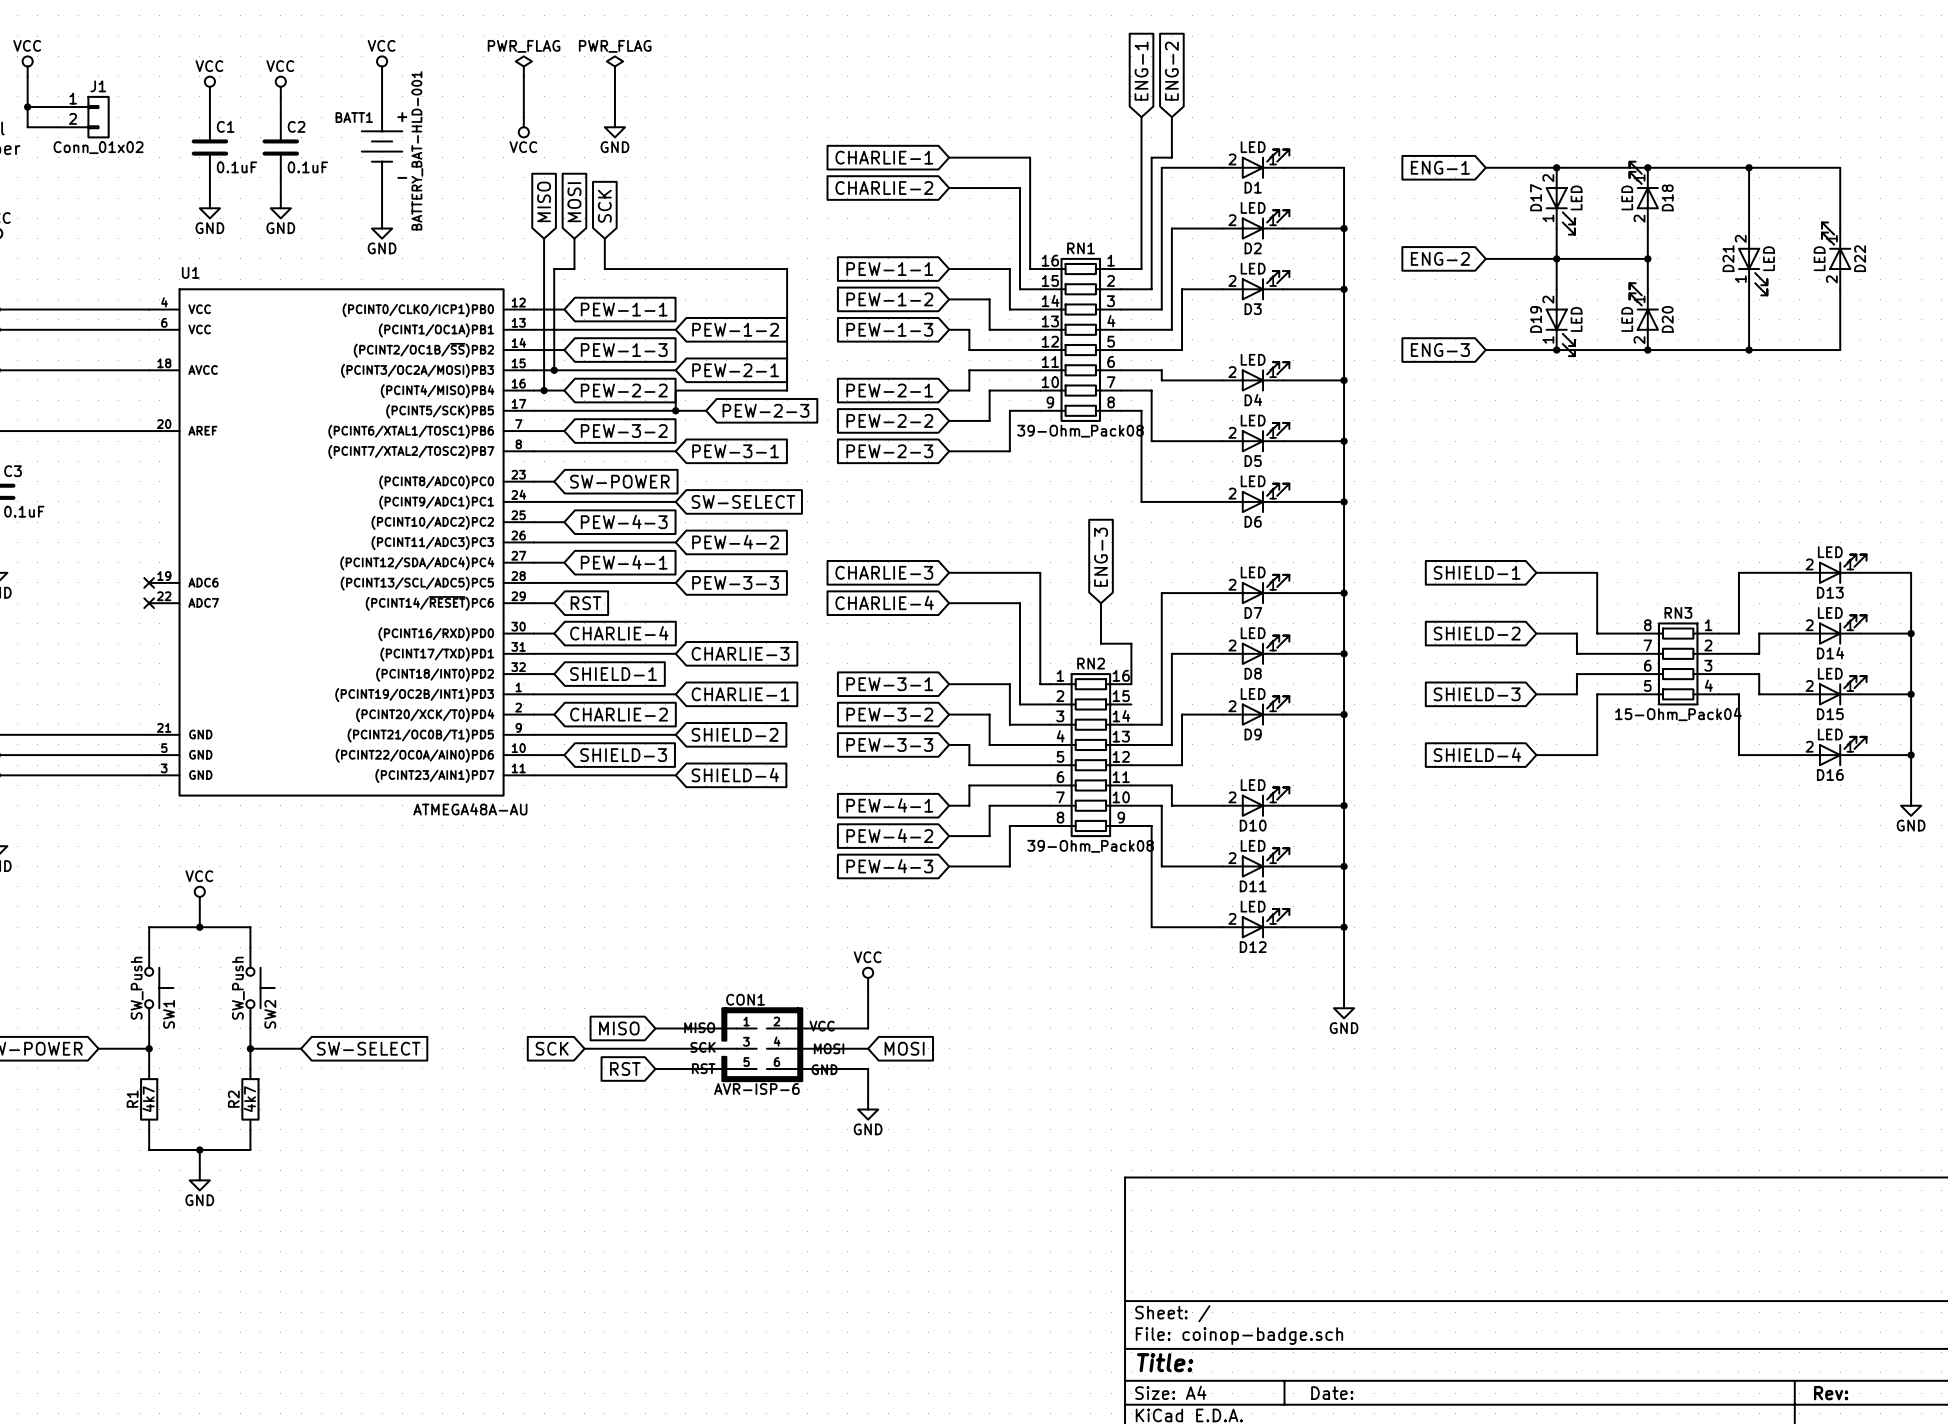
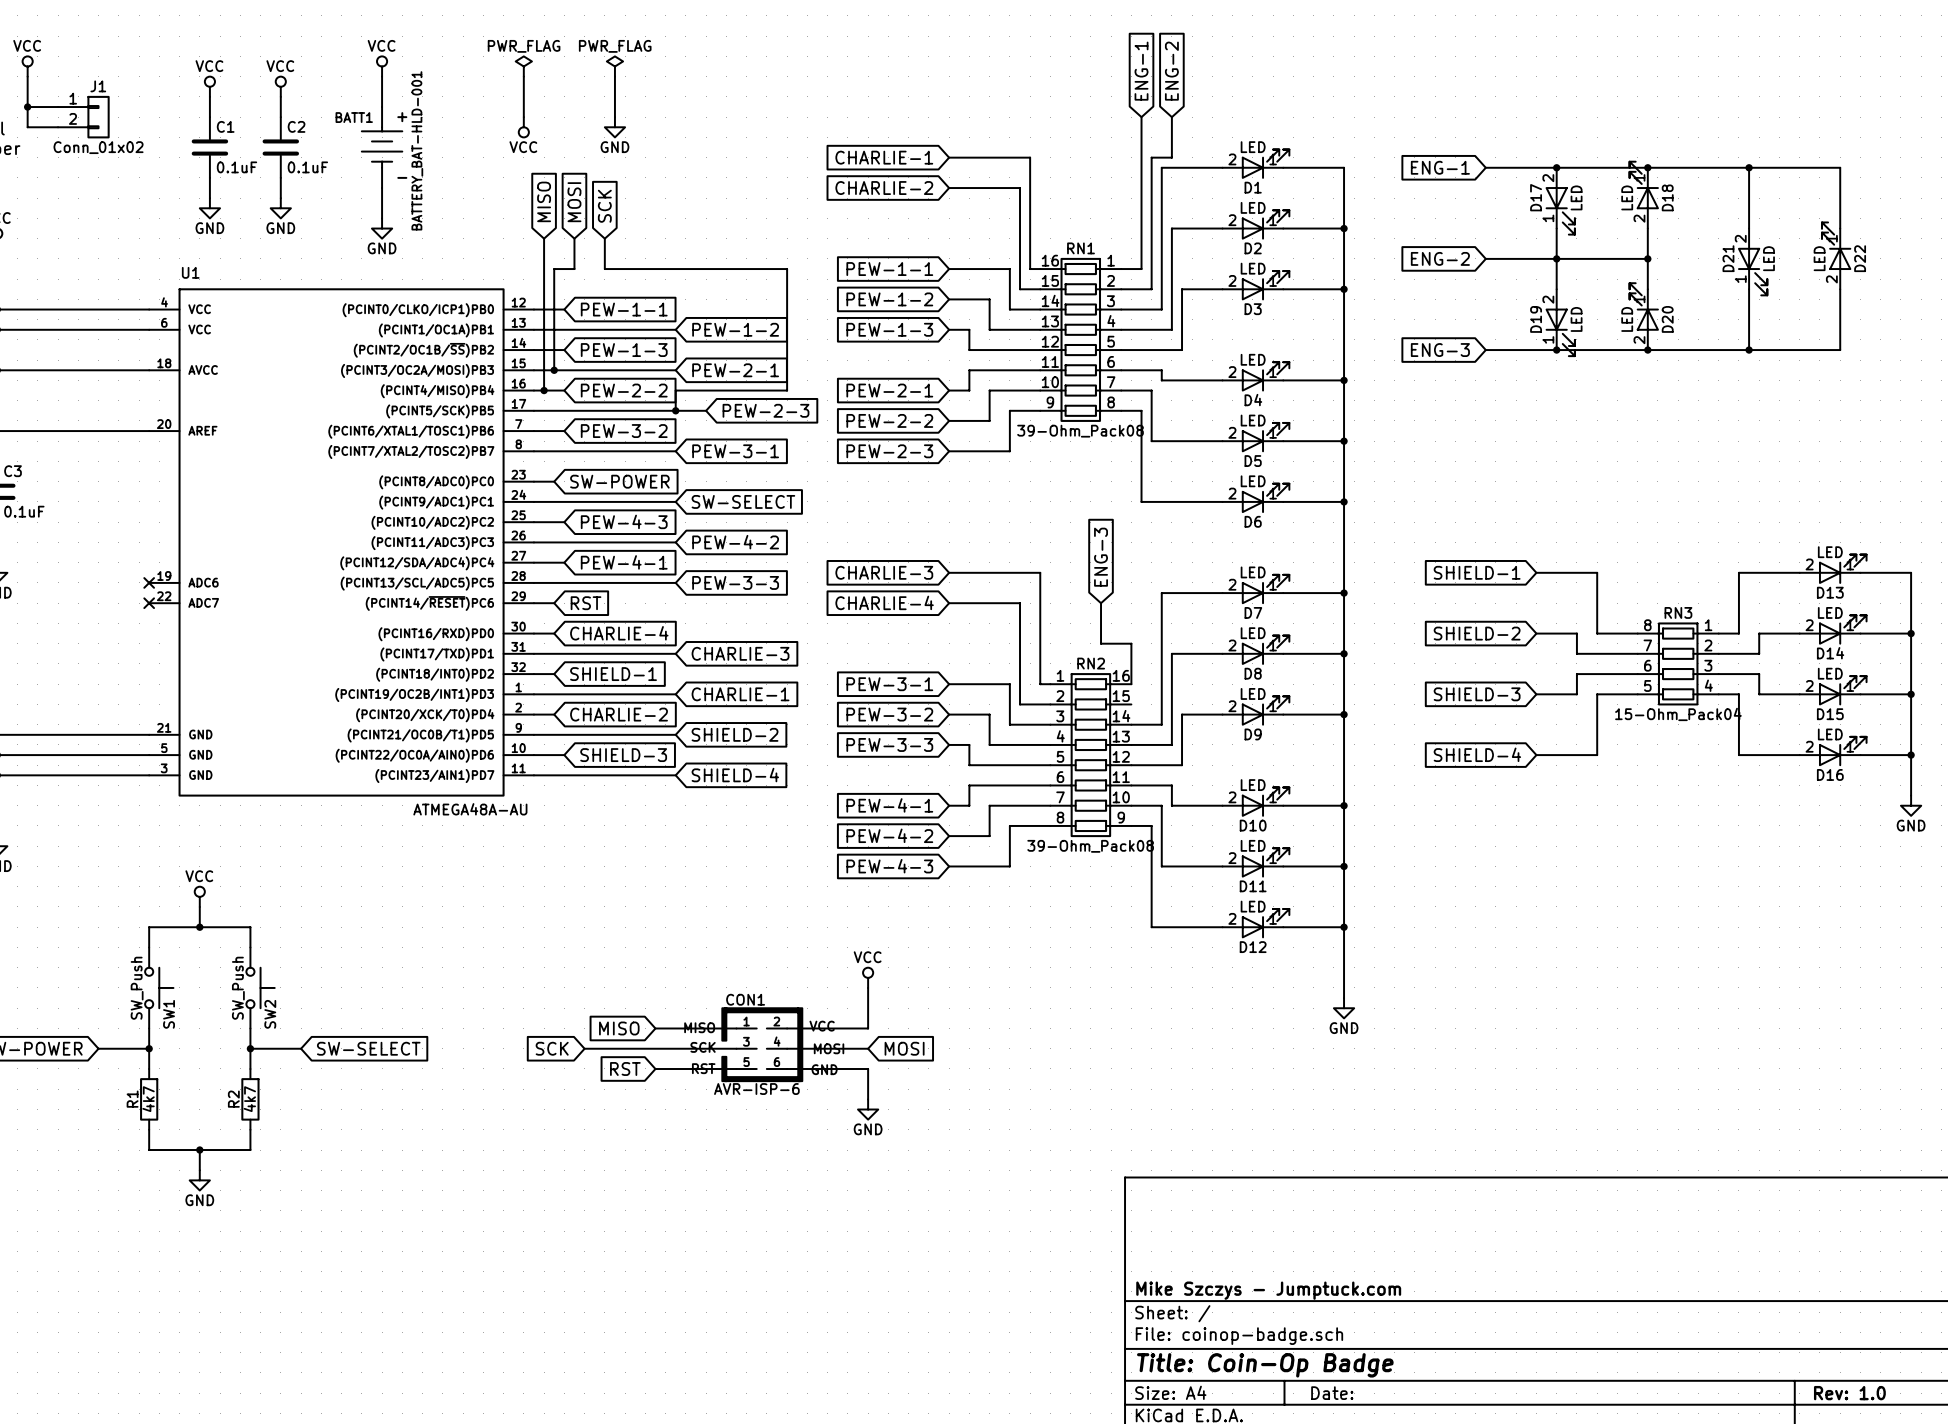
title block: none -> Mike Szczys - Jumptuck.com (1268, 1290)
title block: Title: (1165, 1362) -> Title: Coin-Op Badge (1265, 1365)
title block: Rev: (1831, 1393) -> Rev: 1.0 (1849, 1393)

